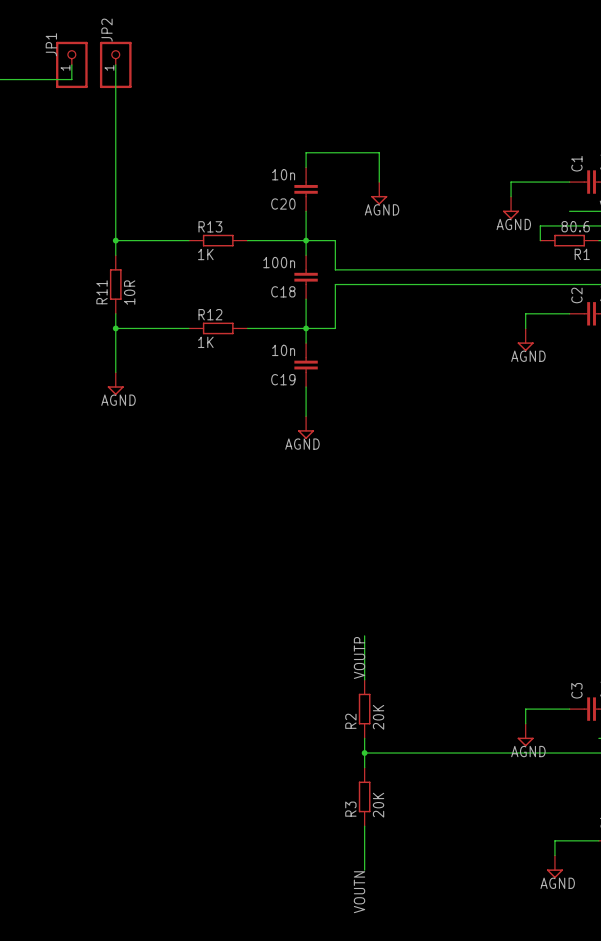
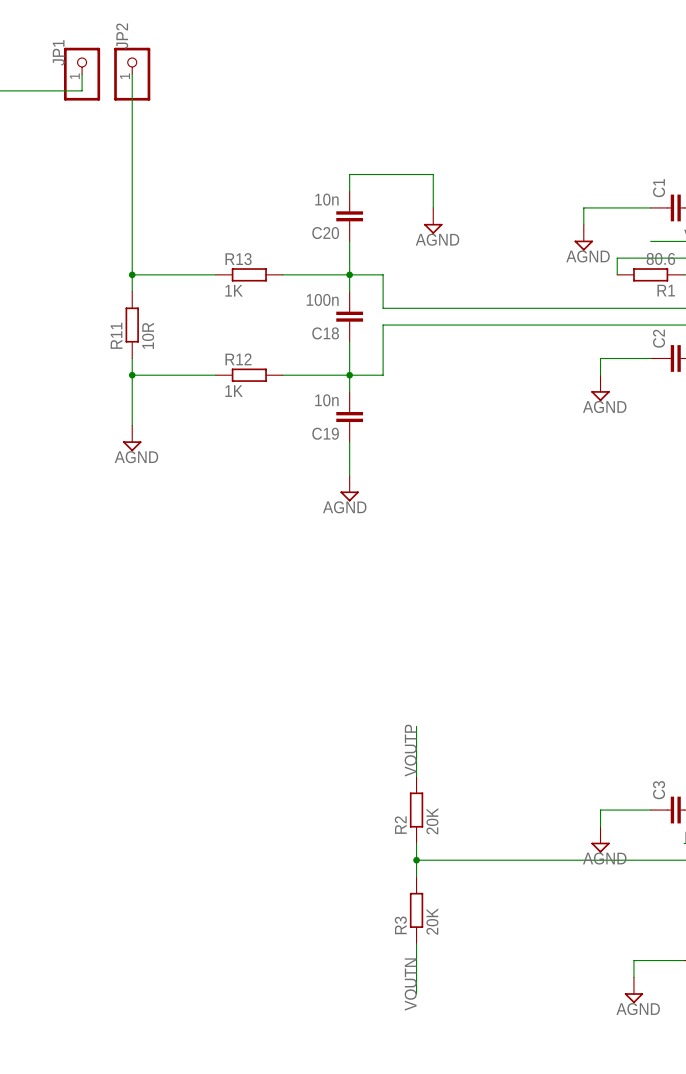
label position: VOUTN (359, 892) -> VOUTN (410, 984)

